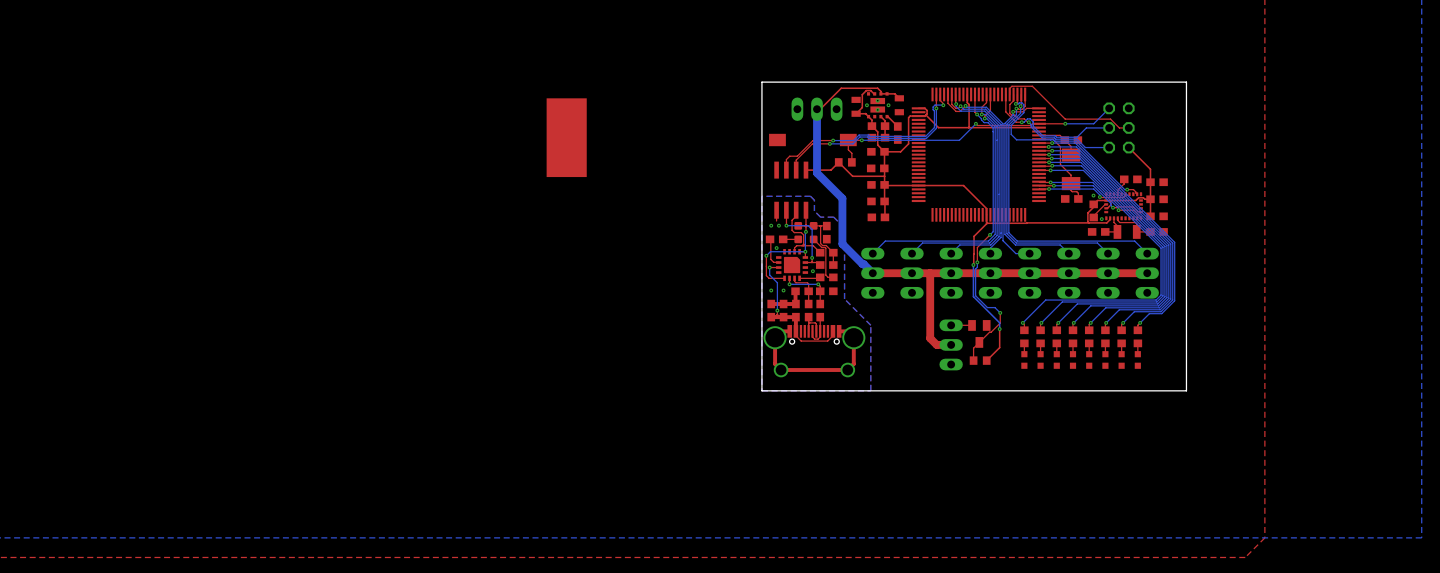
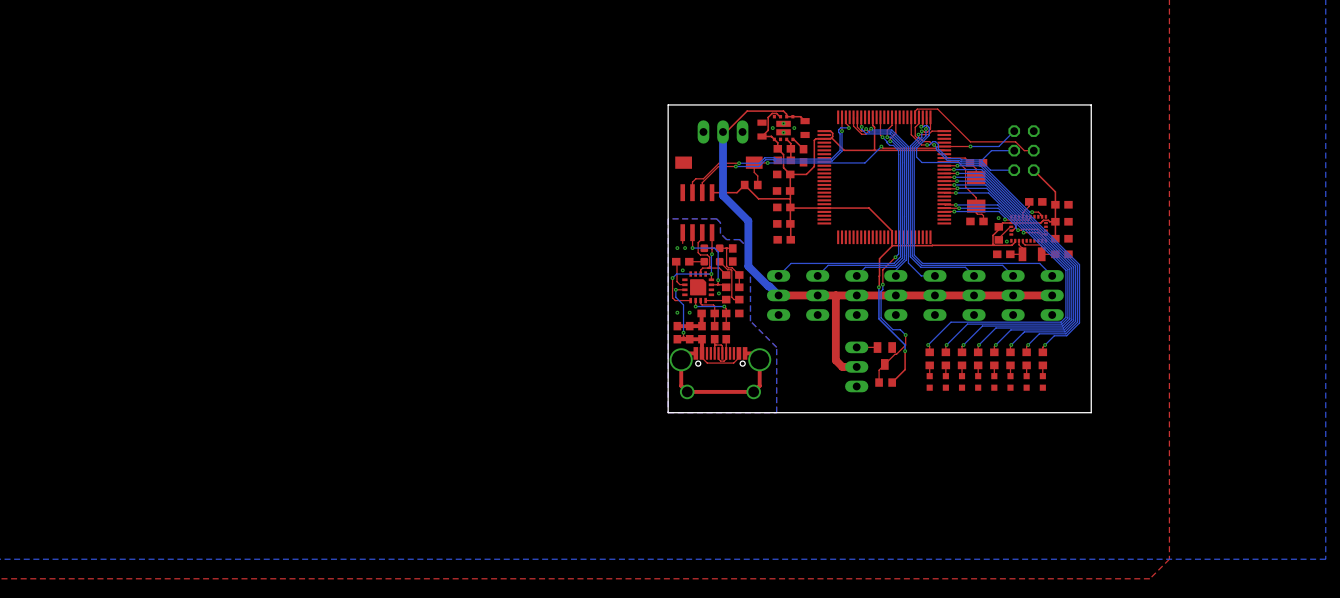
drawing: [546, 98, 587, 178] -> none

